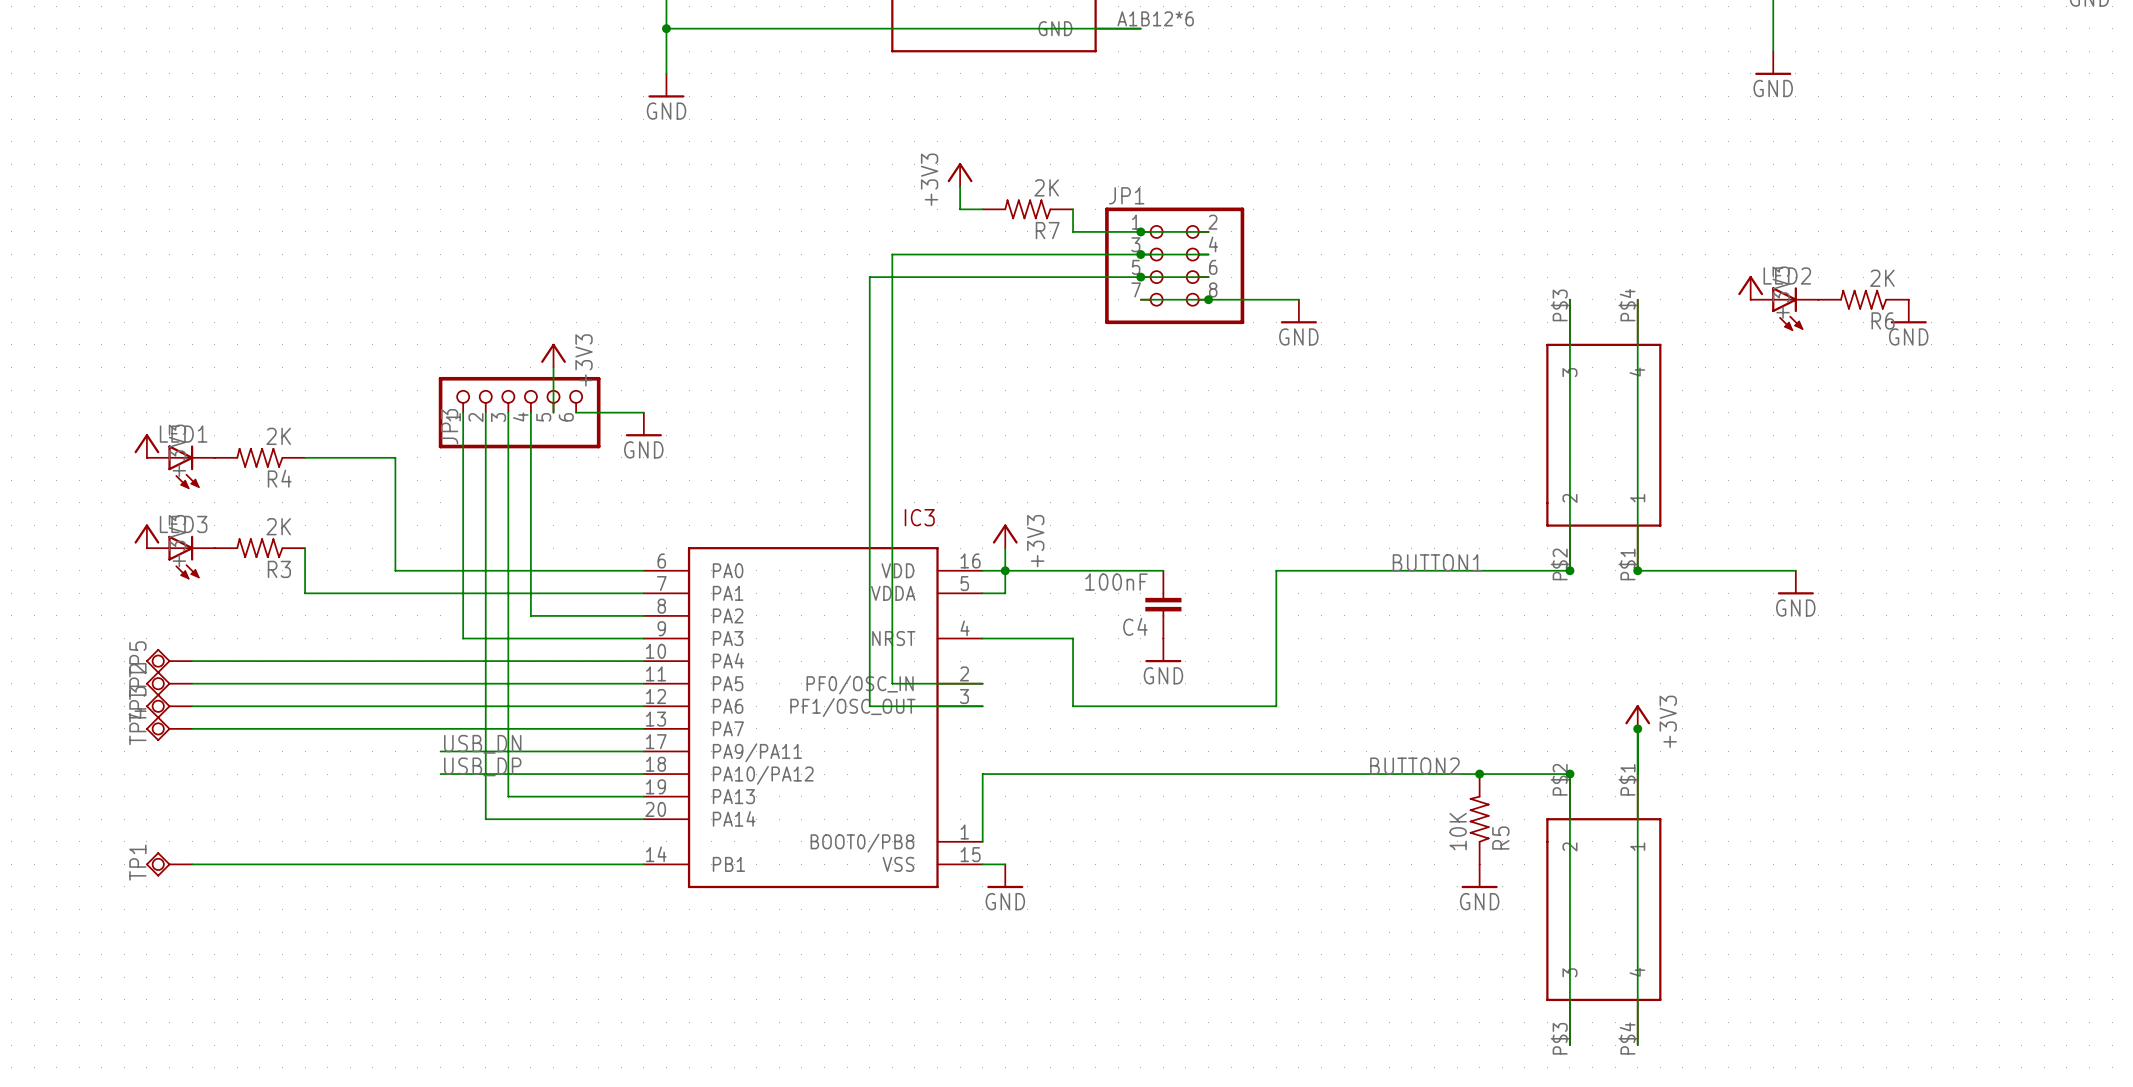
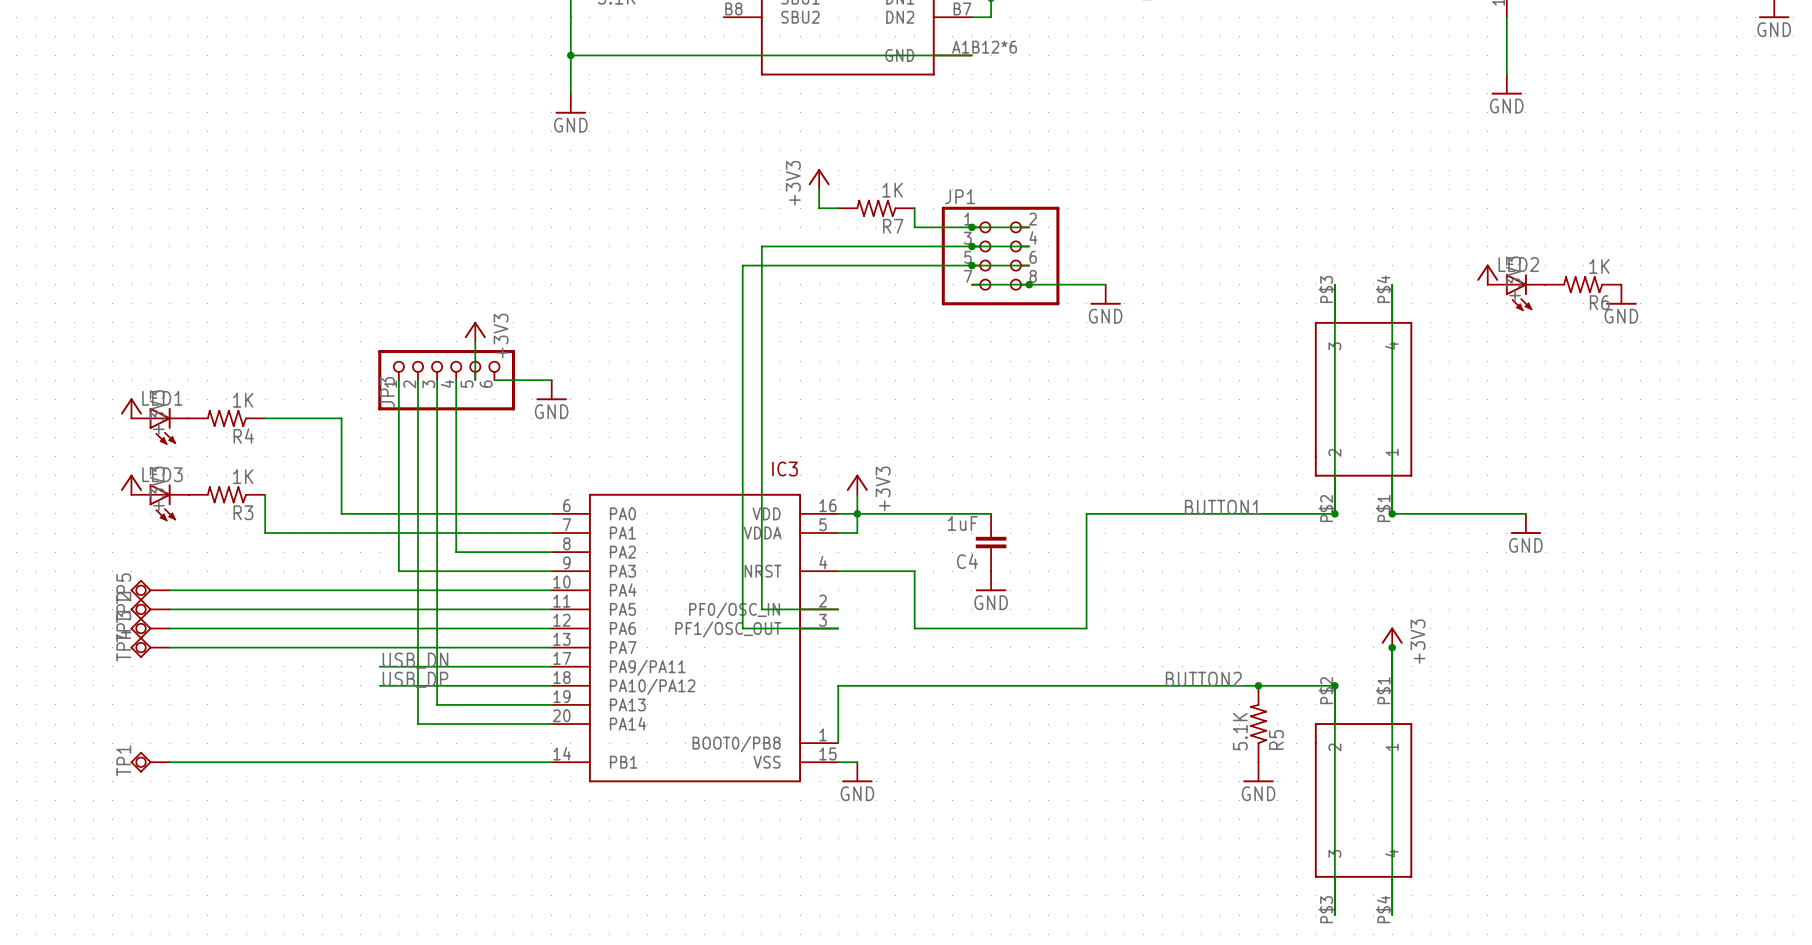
R7 value: 2K (1046, 187) -> 1K (892, 190)
R6 value: 2K (1882, 278) -> 1K (1599, 266)
R4 value: 2K (278, 436) -> 1K (243, 400)
R3 value: 2K (278, 526) -> 1K (243, 476)
C4 value: 100nF (1116, 582) -> 1uF (962, 523)
R5 value: 10K (1458, 831) -> 5.1K (1240, 731)

